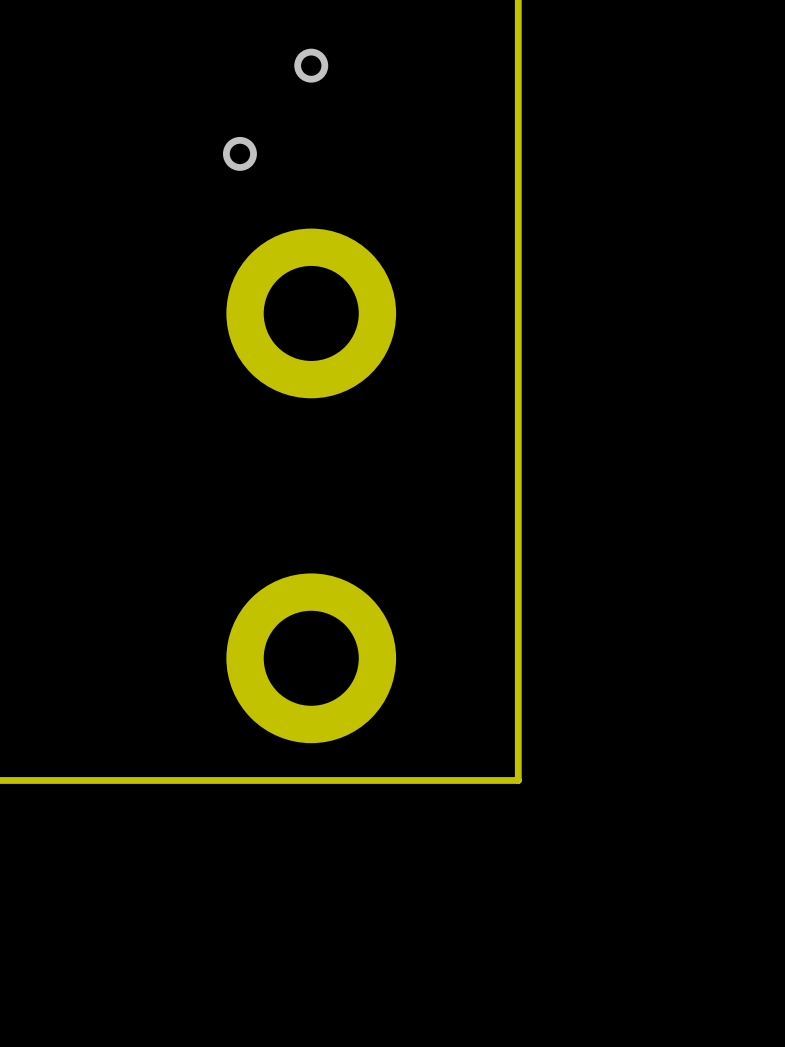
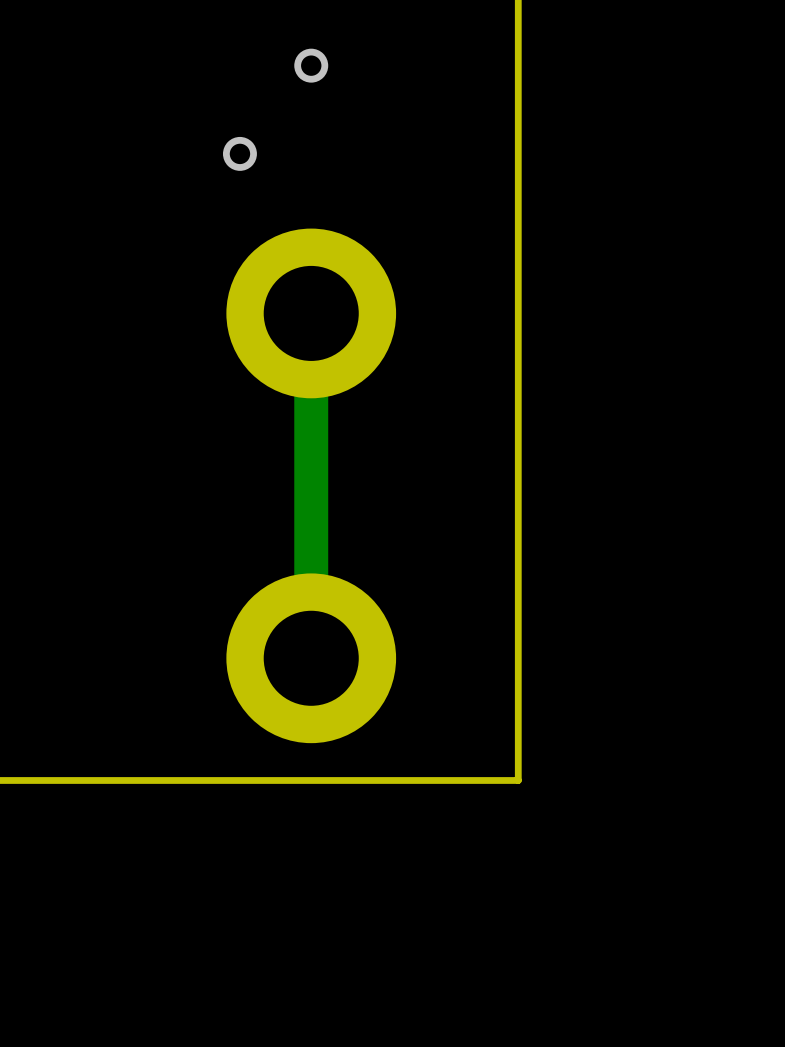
track: none -> (311, 313) (311, 658)

